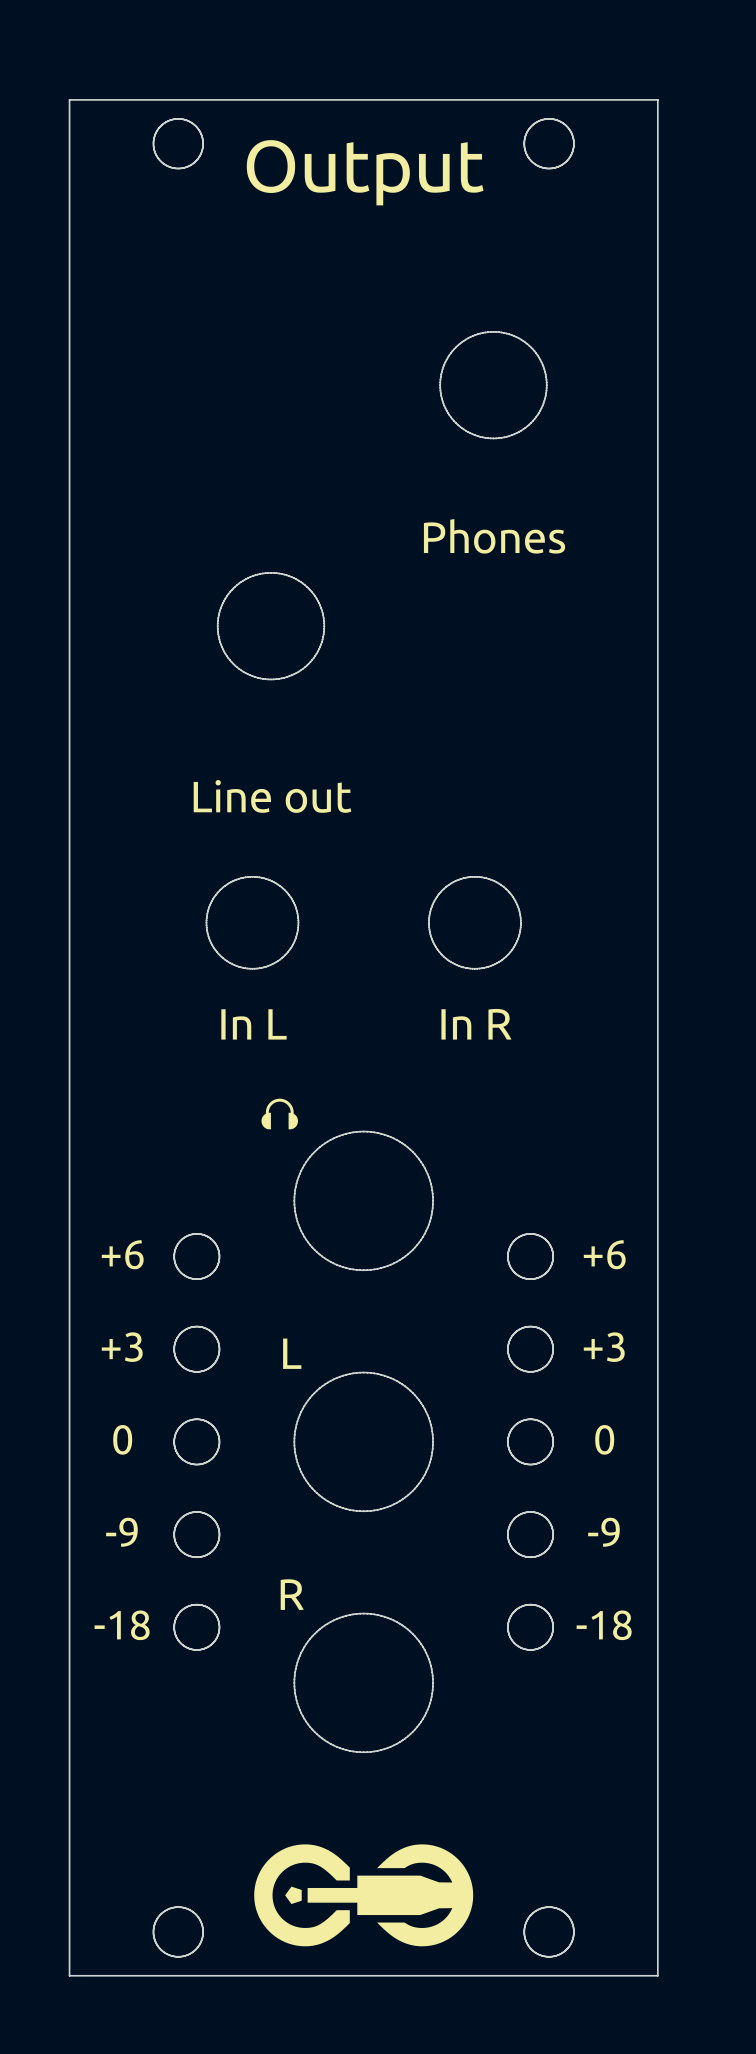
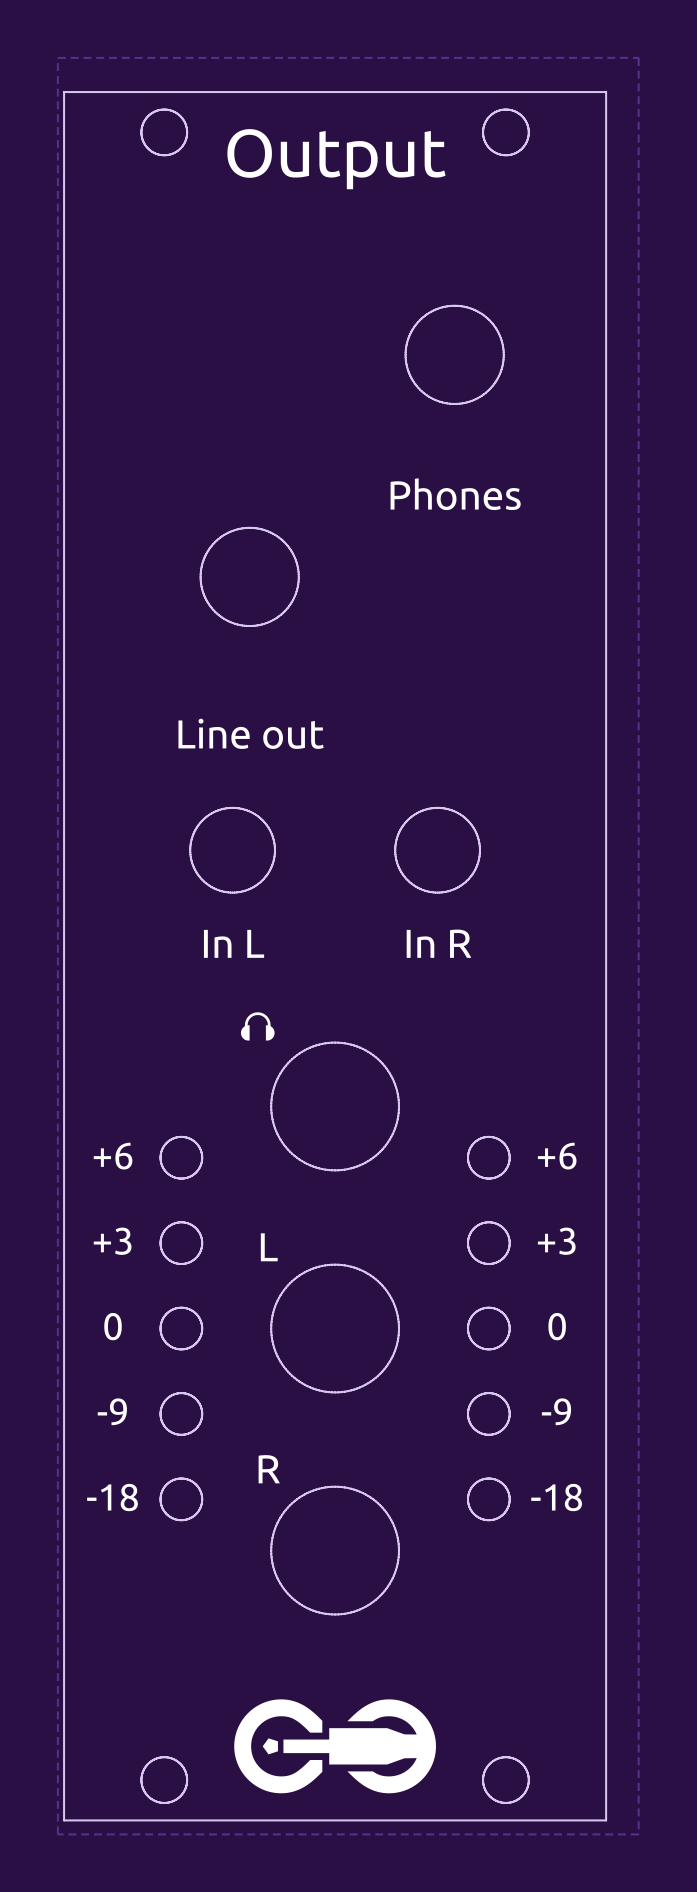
zone outline: none -> (57, 57) (638, 57) (638, 1834) (57, 1834) (57, 57)

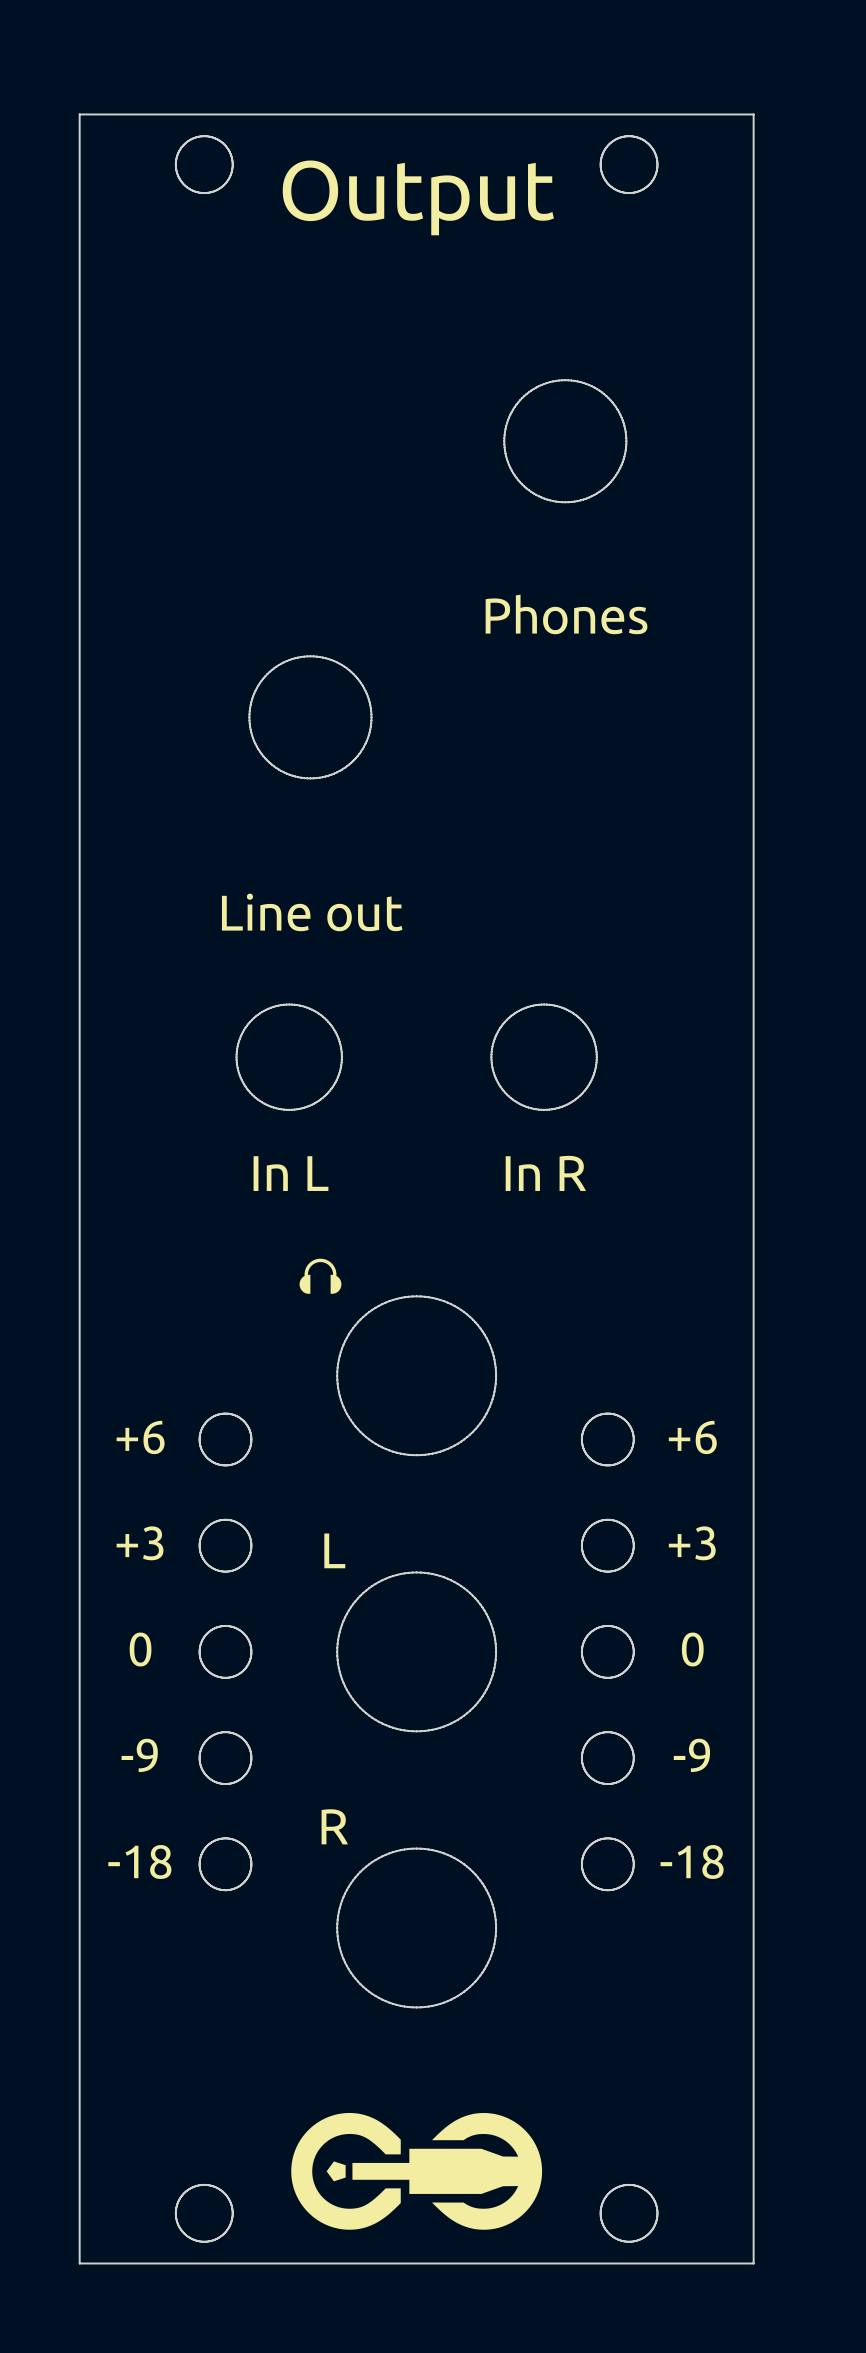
zone outline: (57, 57) (638, 57) (638, 1834) (57, 1834) (57, 57) -> none

